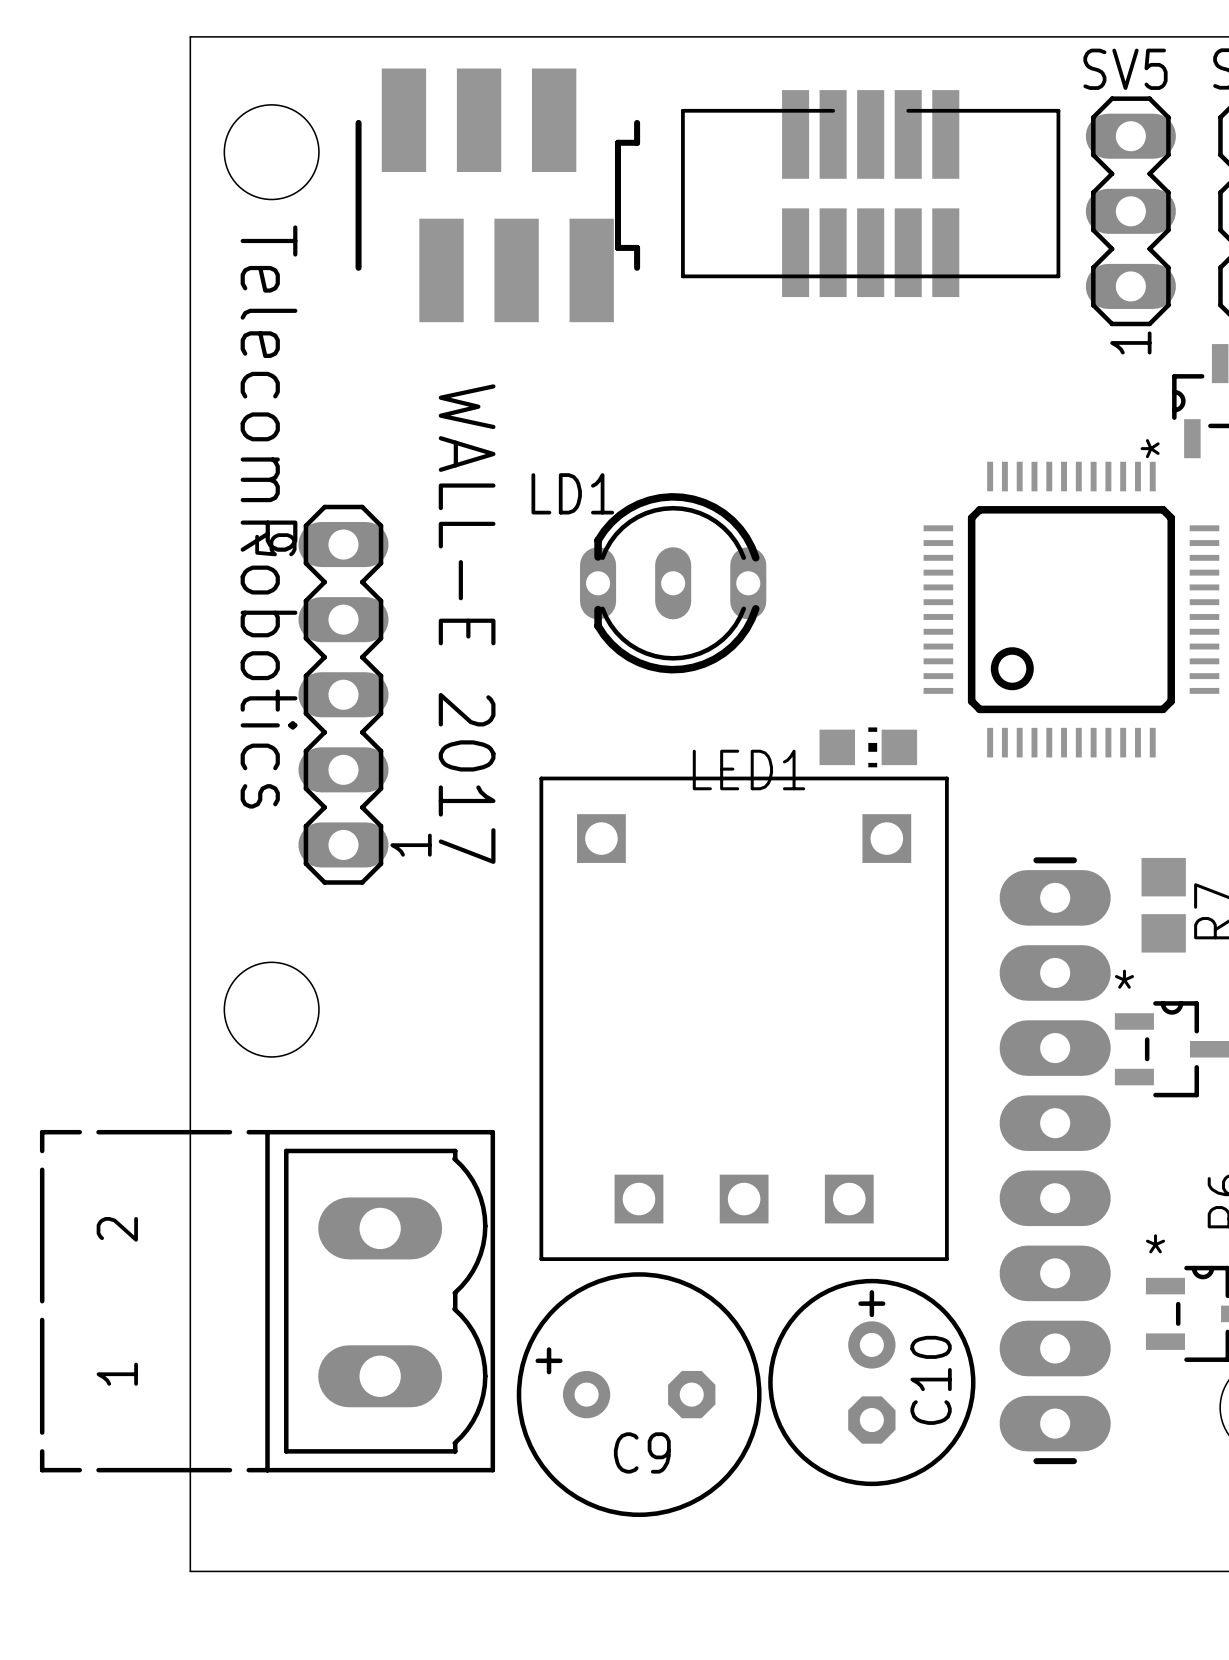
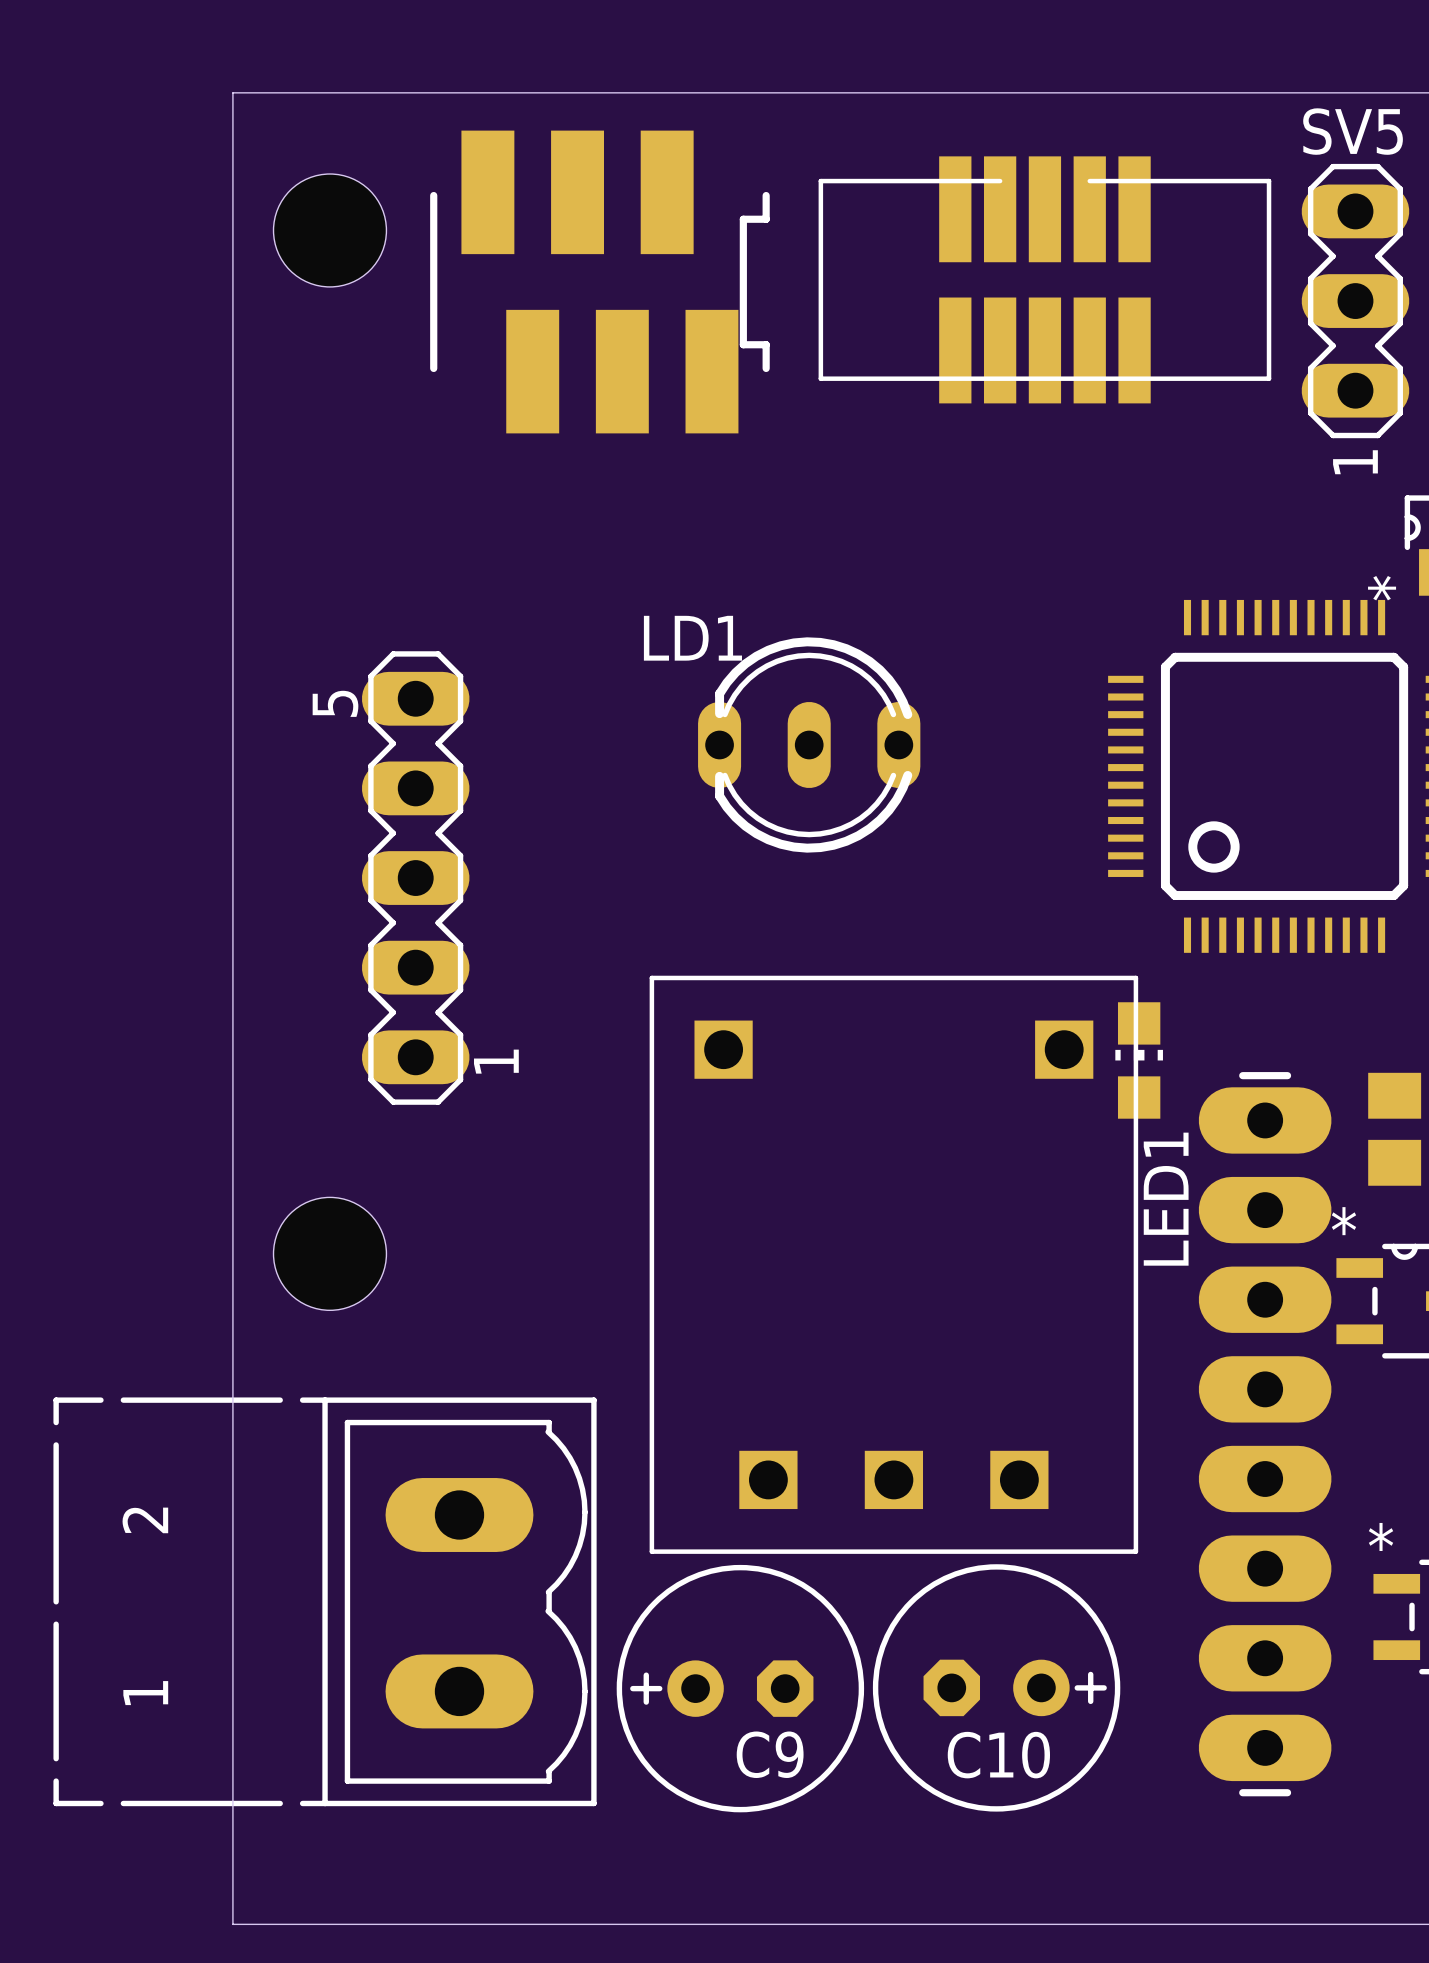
text: TelecomRobotics (269, 516) -> none
text: WALL-E 2017 (467, 624) -> none
LED1 rotation: 0° (868, 747) -> 90° counterclockwise (1139, 1060)
LED1 position: (868, 747) -> (1139, 1060)
C9 footprint: [516, 1272, 762, 1518] -> [616, 1564, 865, 1813]
C10 rotation: 0° (871, 1382) -> 90° clockwise (996, 1687)

